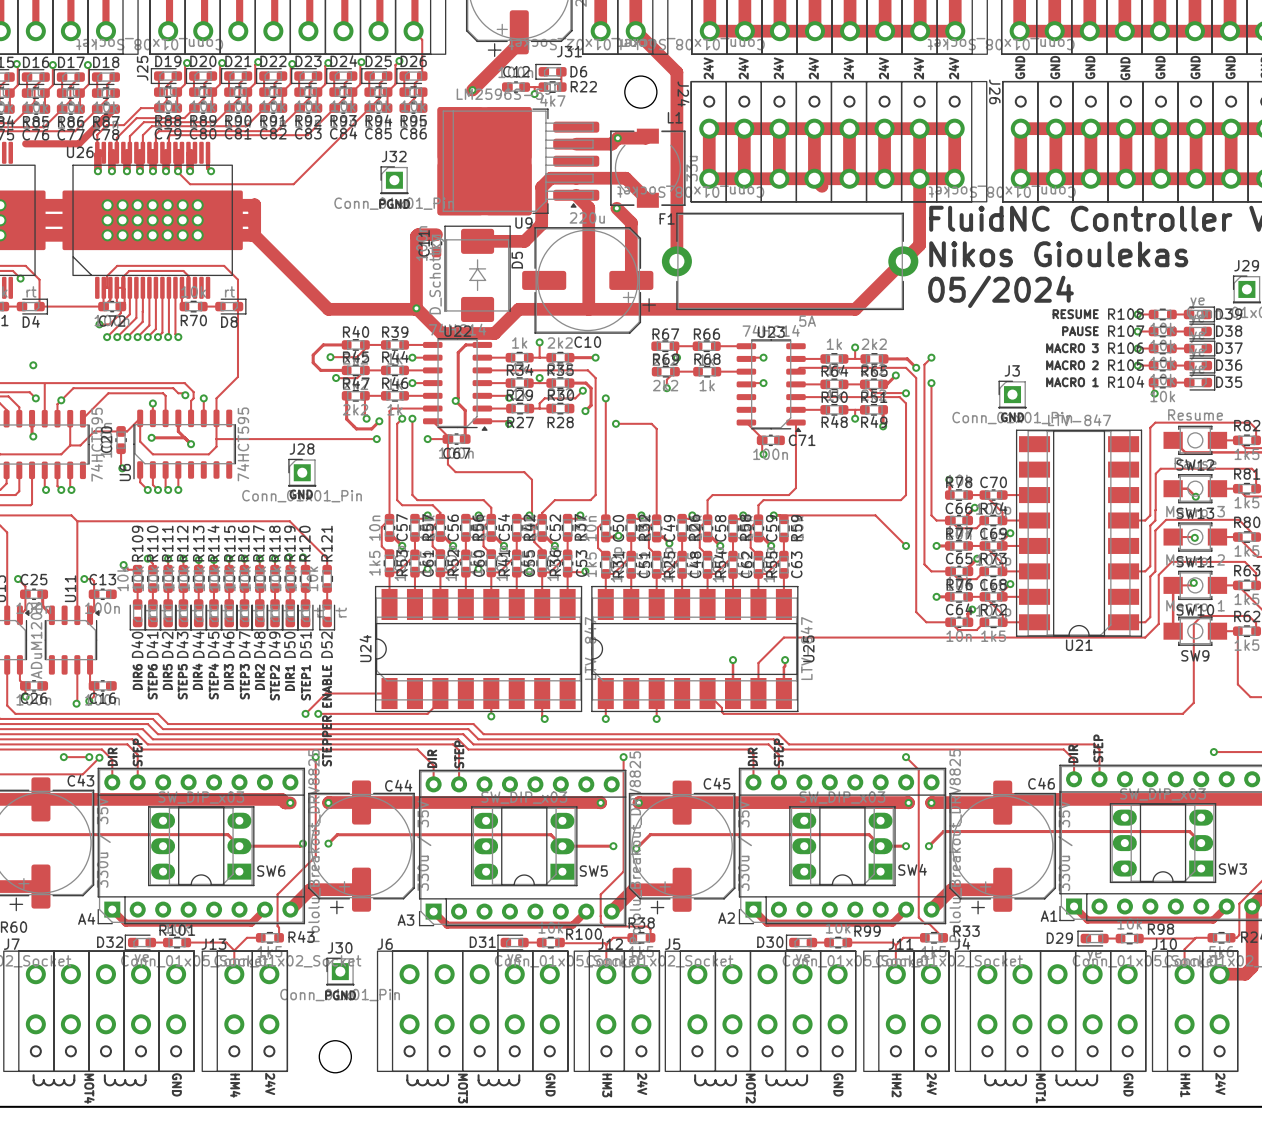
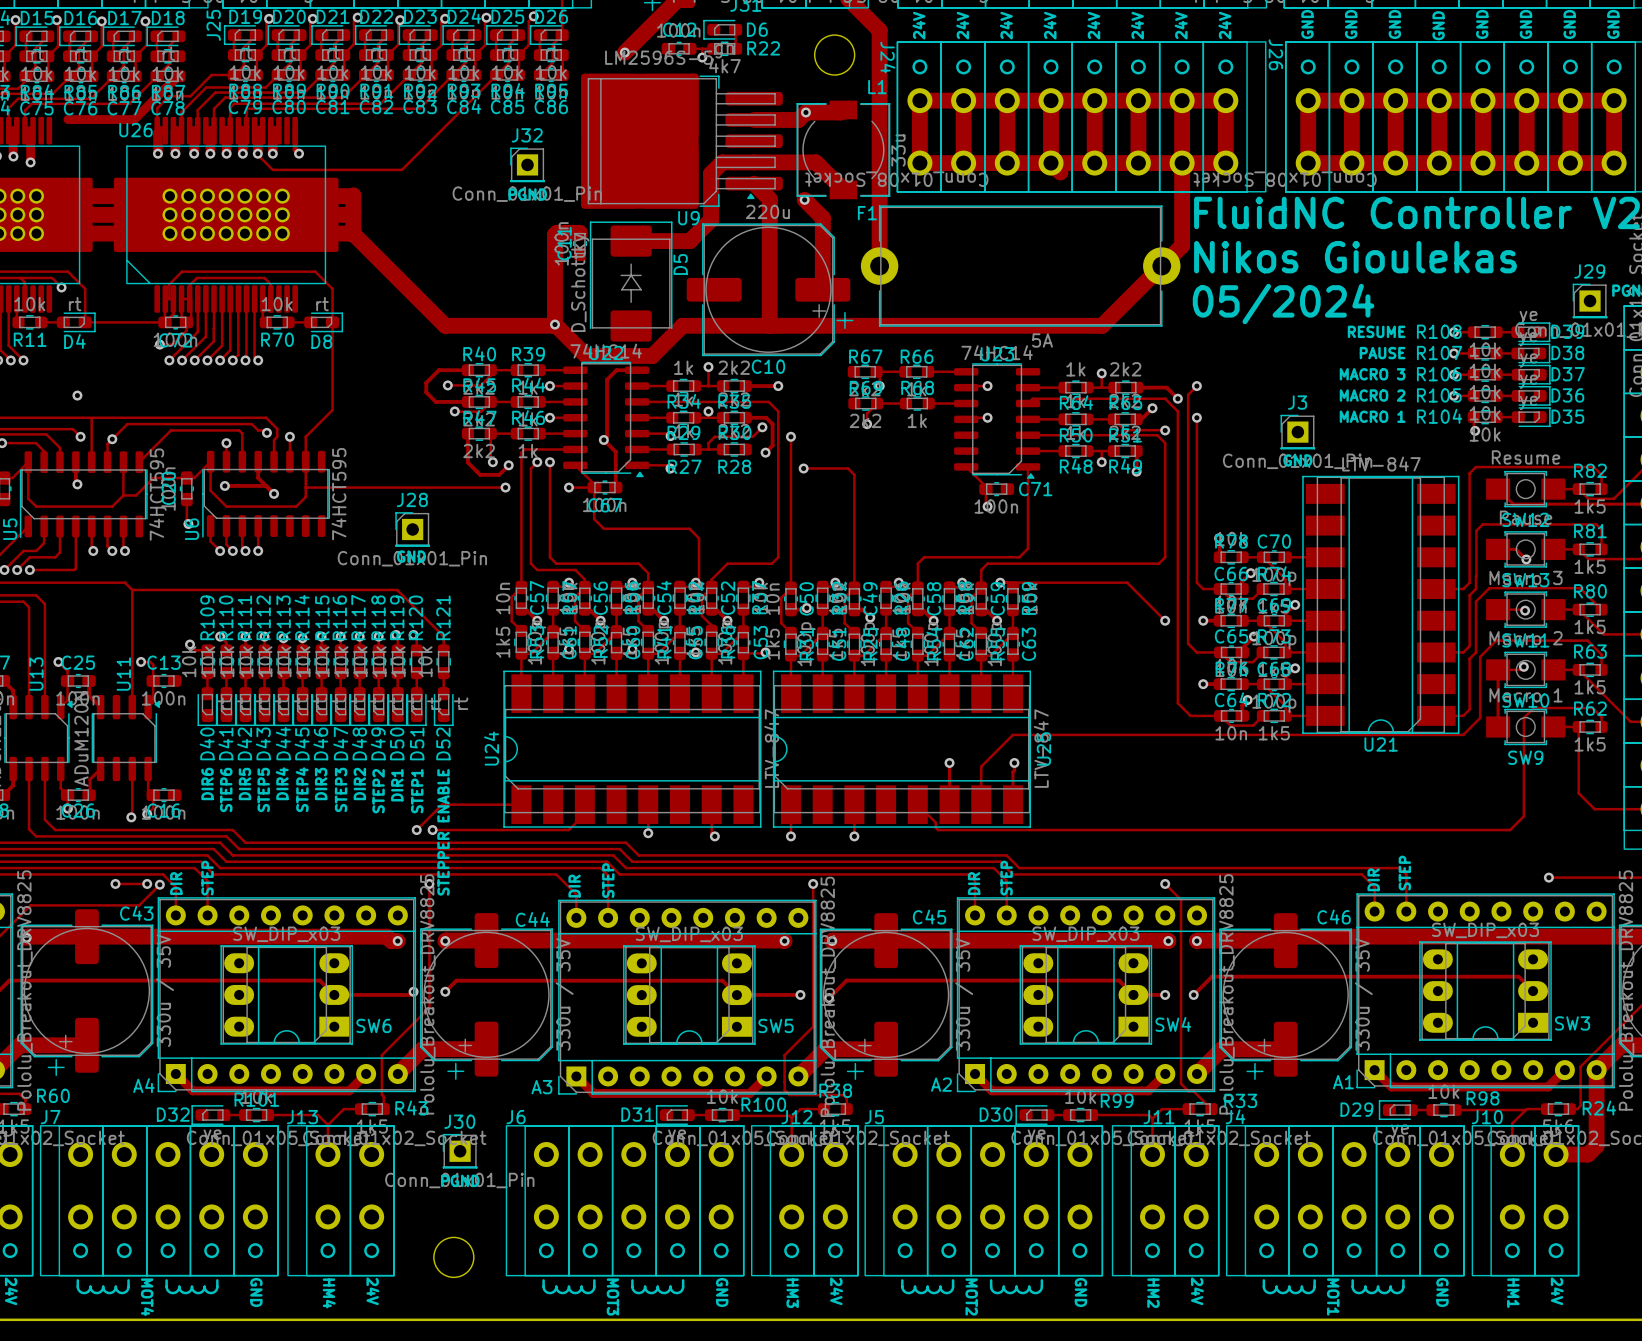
track: none -> (100, 768) (90, 779) (90, 795)

